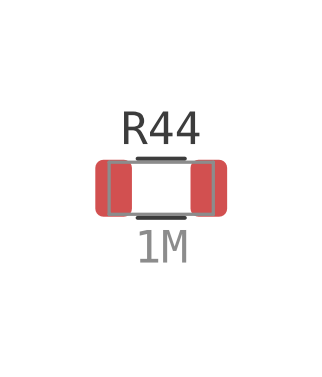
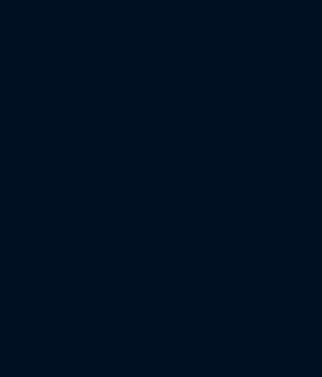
R44: 1M (161, 188) -> none

